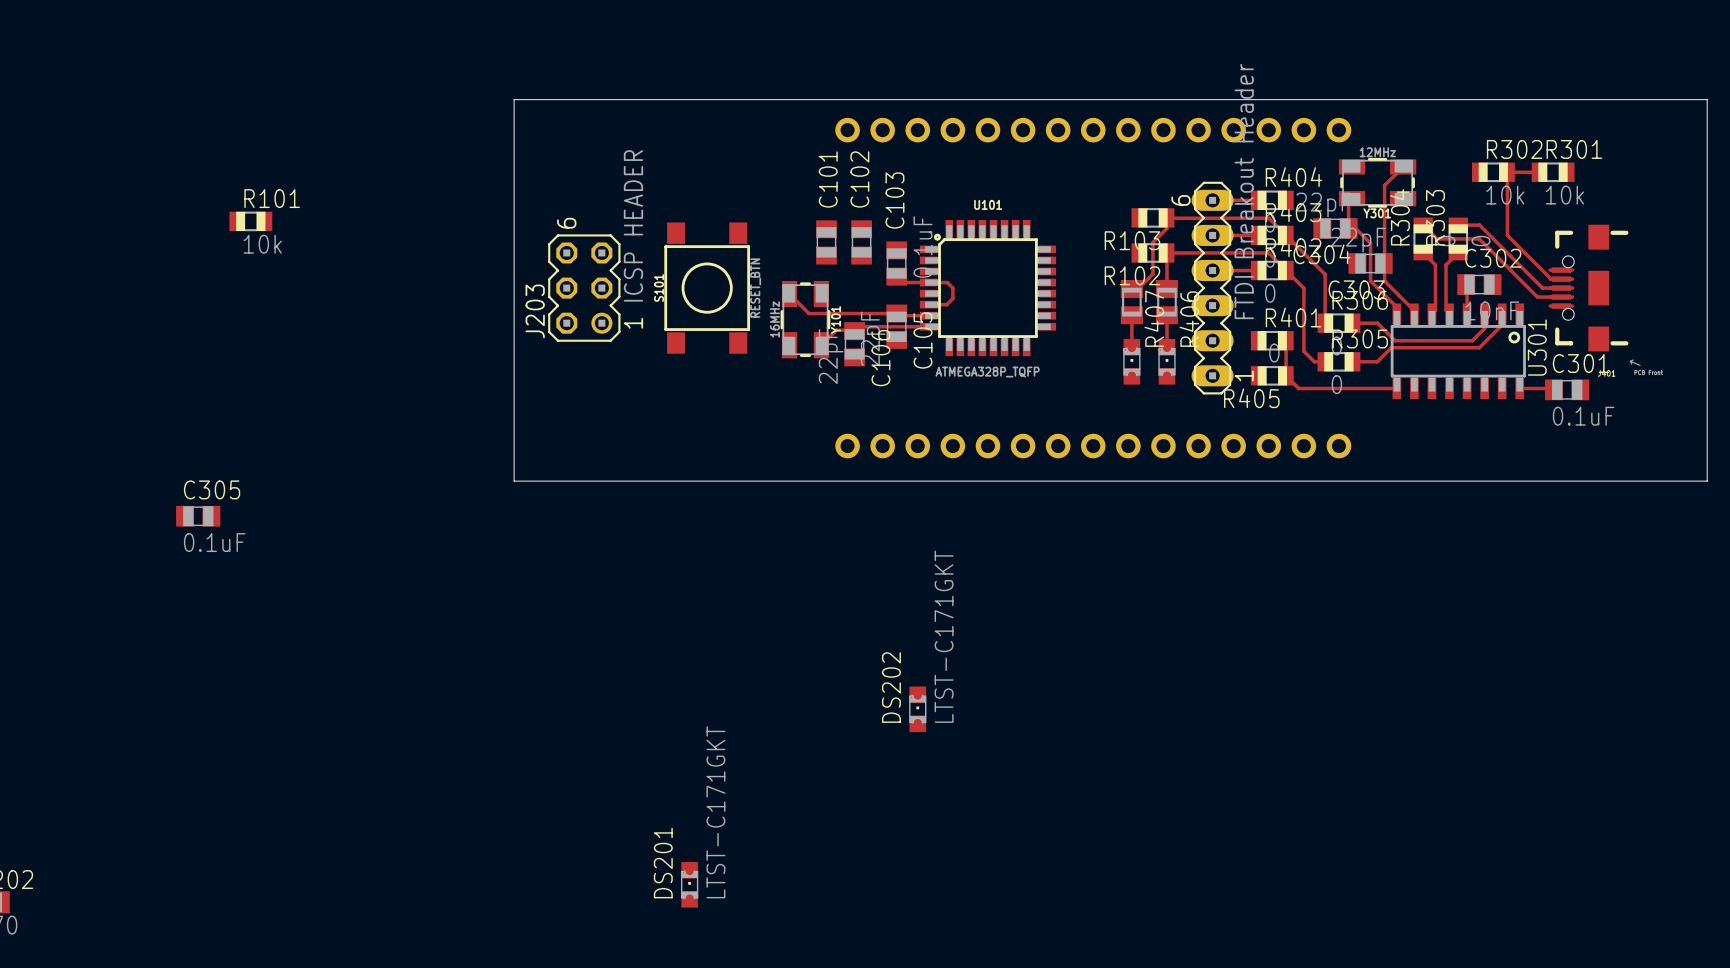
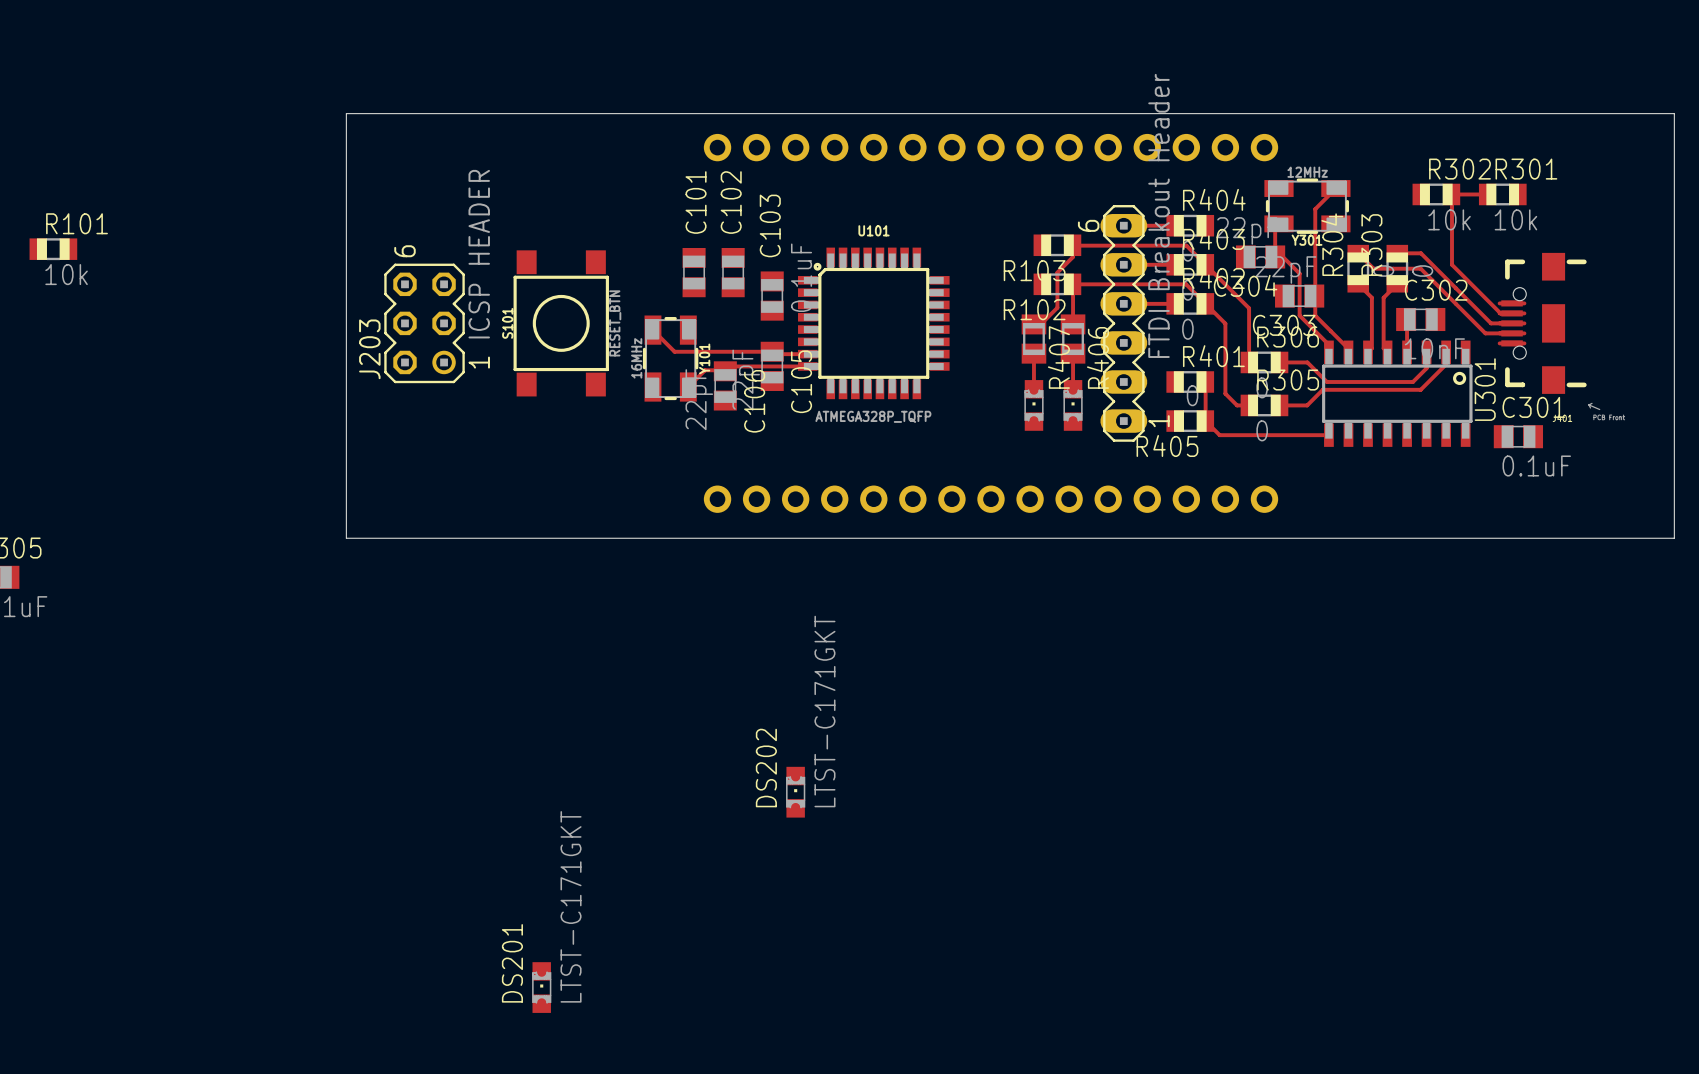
track: (896, 276) (902, 282) (947, 282) (952, 288) (952, 298) (946, 304) (927, 305) -> none
track: (1519, 388) (1553, 389) -> none

